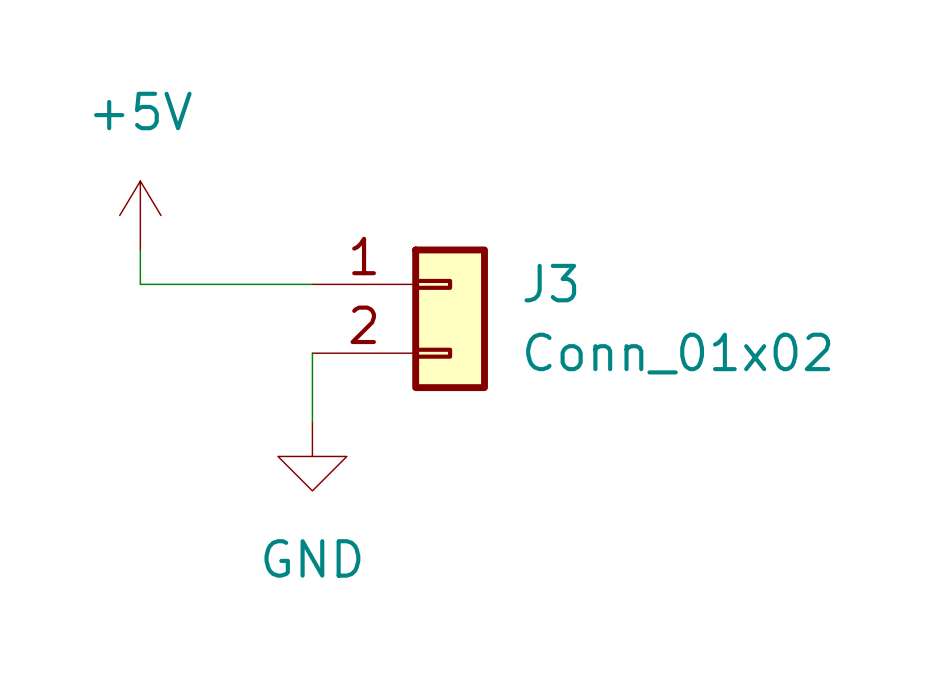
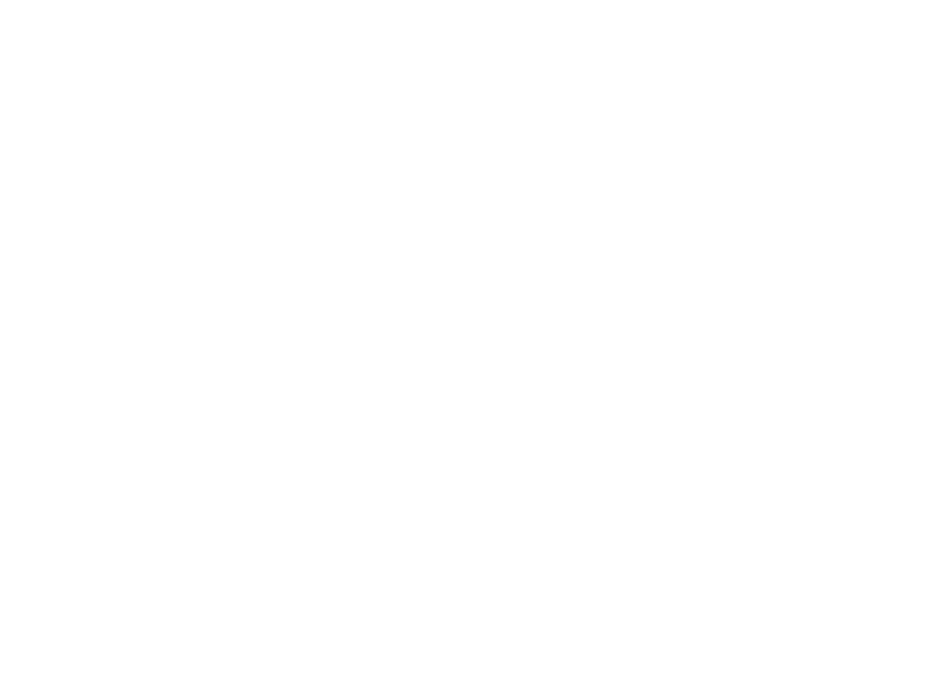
power symbol: +5V (140, 215) -> none
wire: (140, 249) (140, 284) (312, 284) -> none
J3: Conn_01x02 (400, 318) -> none
wire: (312, 353) (312, 422) -> none
power symbol: GND (312, 456) -> none

